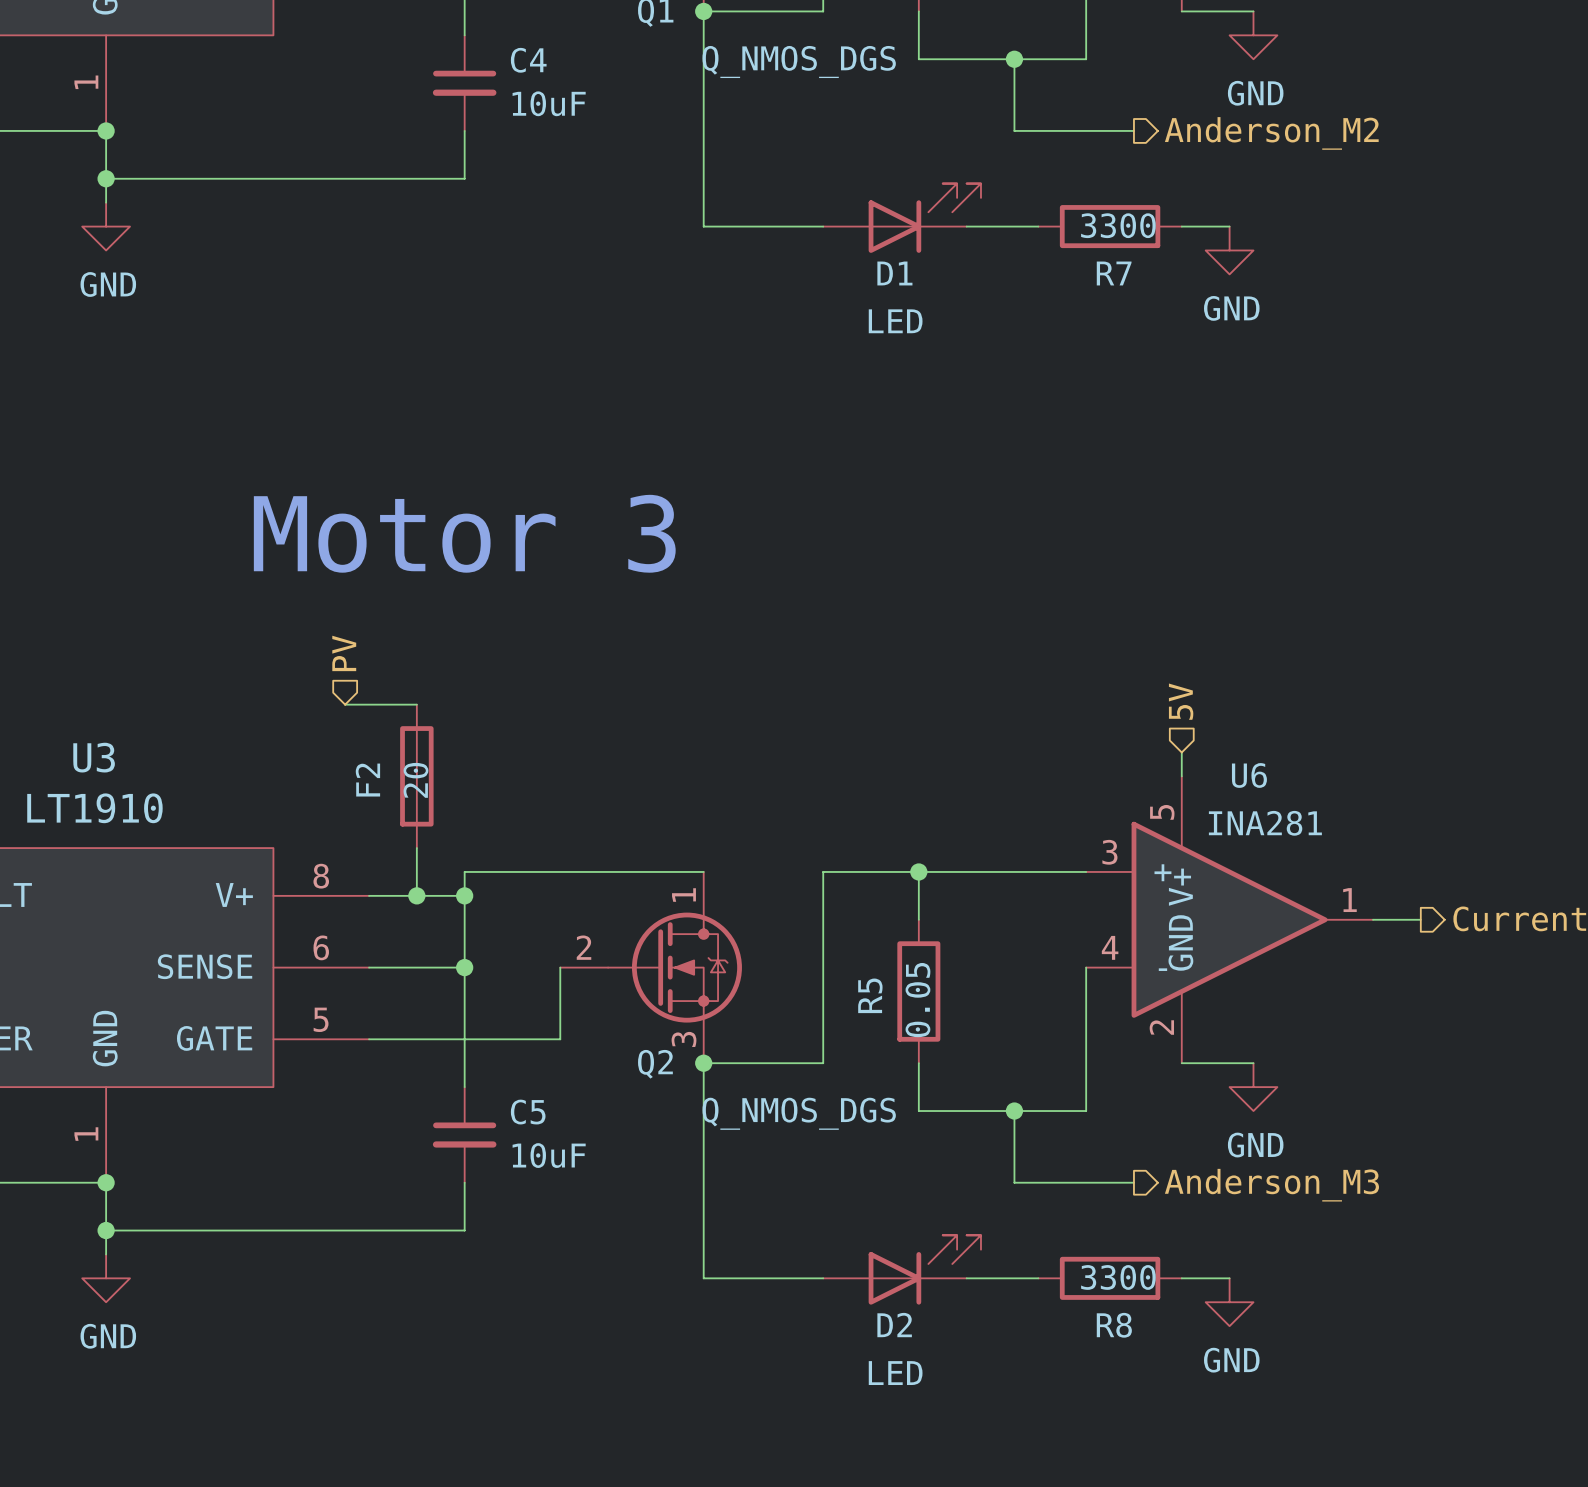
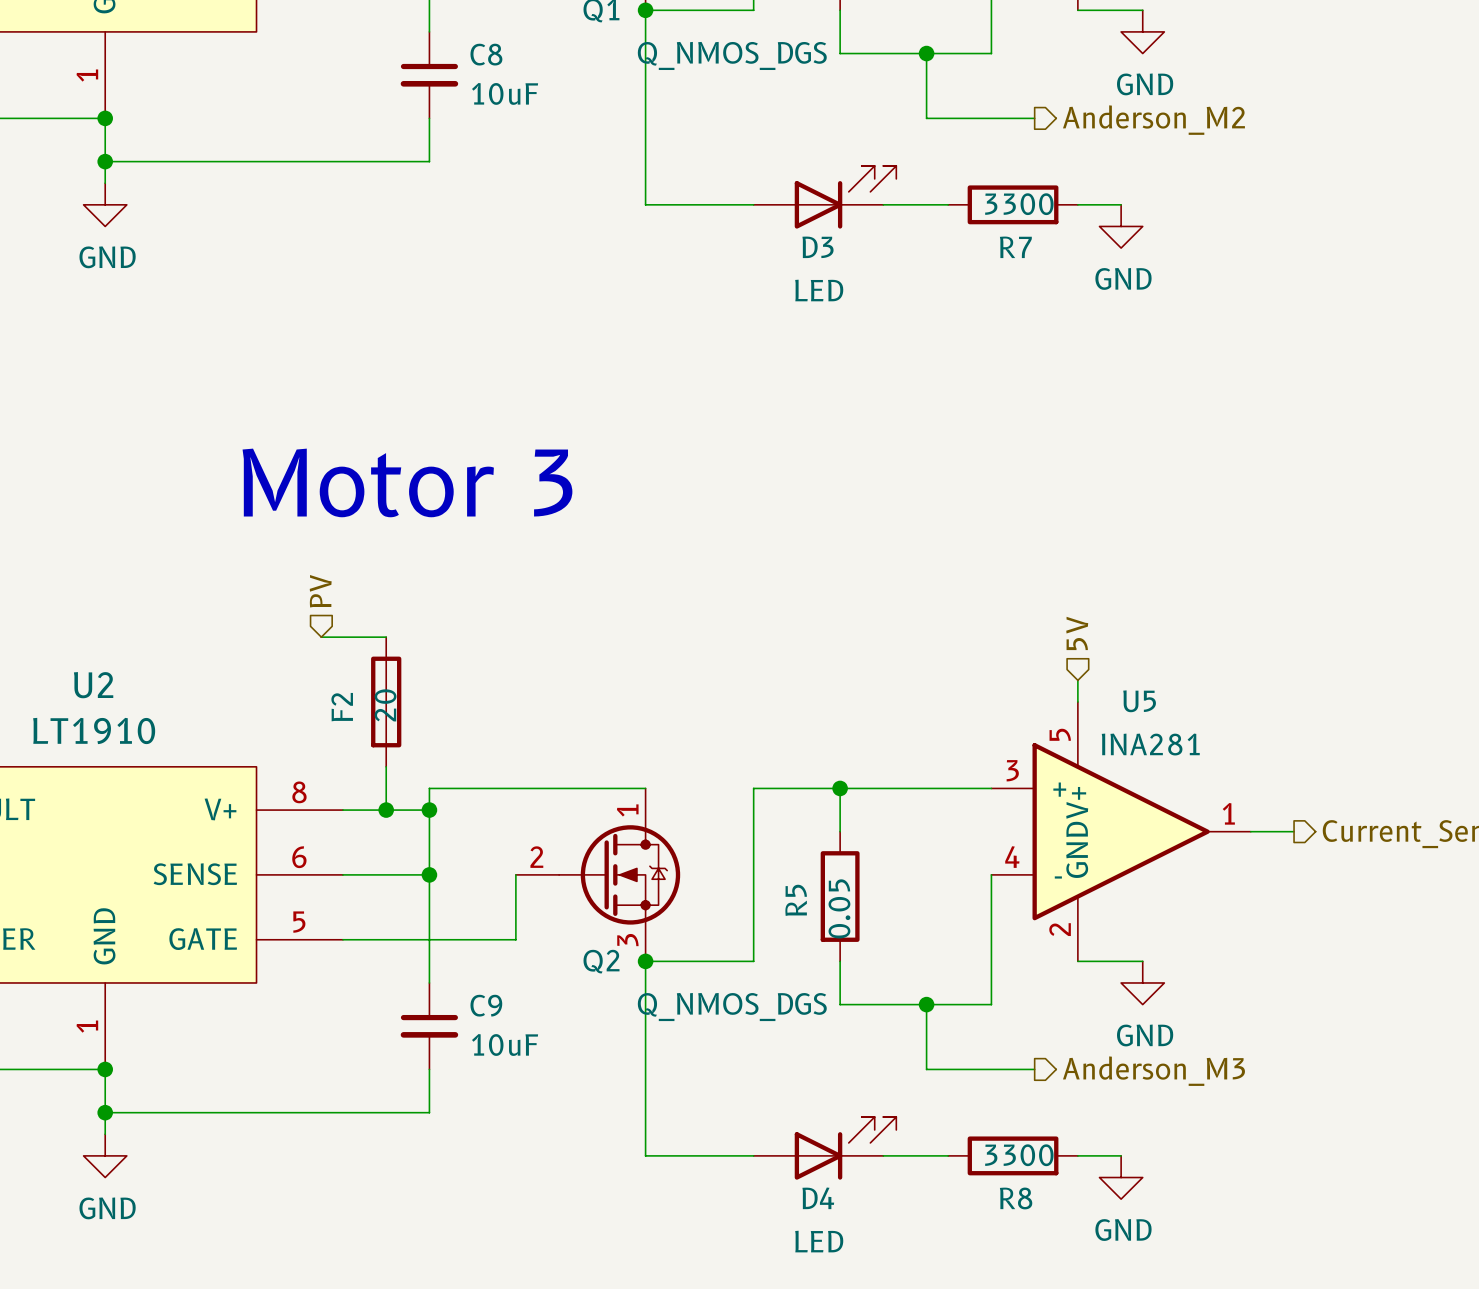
C4 name: C4 (528, 60) -> C8 (486, 54)
D1 name: D1 (894, 273) -> D3 (817, 247)
U3 name: U3 (94, 757) -> U2 (93, 685)
U6 name: U6 (1249, 775) -> U5 (1139, 701)
C5 name: C5 (528, 1112) -> C9 (486, 1005)
D2 name: D2 (894, 1325) -> D4 (818, 1198)

